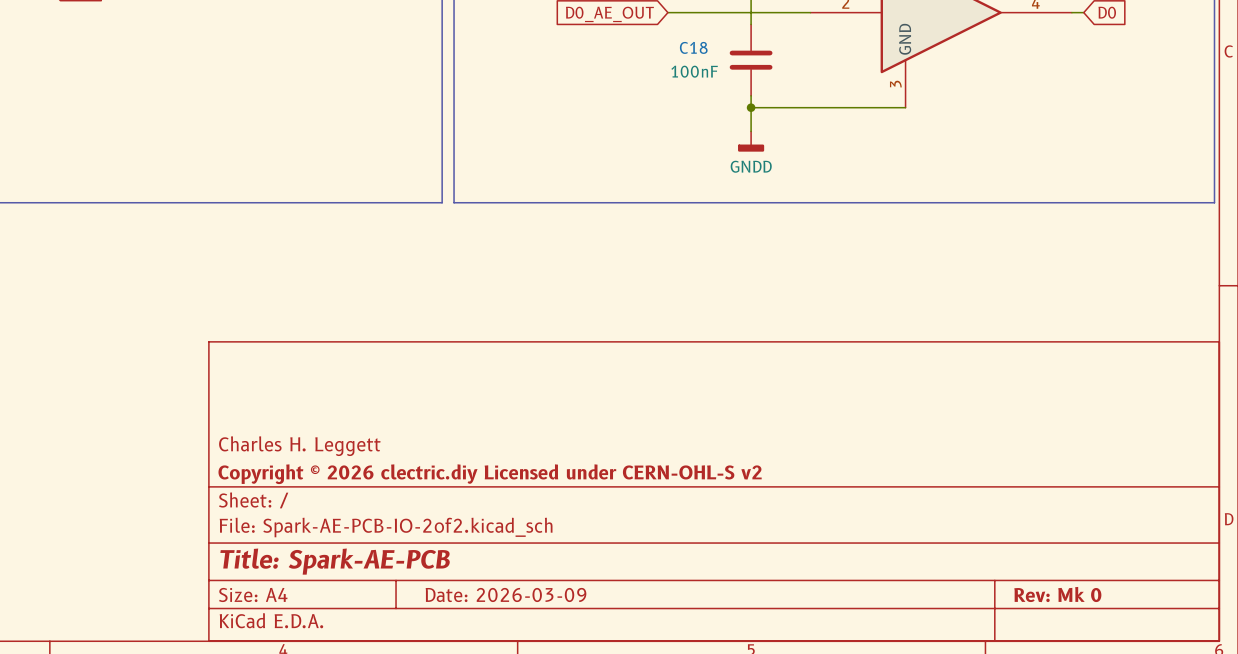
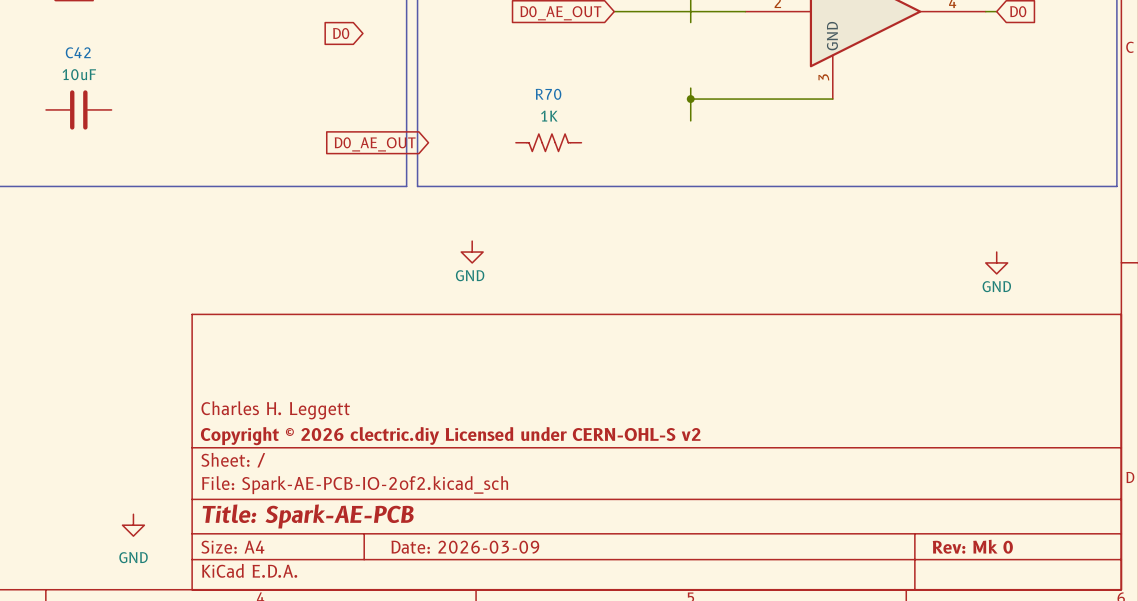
global label: none -> D0 (341, 33)
C18: 100nF (751, 60) -> none
C42: none -> 10uF (78, 109)
power symbol: GNDD (751, 141) -> none
R70: none -> 1K (548, 142)
global label: none -> D0_AE_OUT (375, 144)
power symbol: none -> GND (472, 252)
power symbol: none -> GND (996, 262)
power symbol: none -> GND (133, 525)

